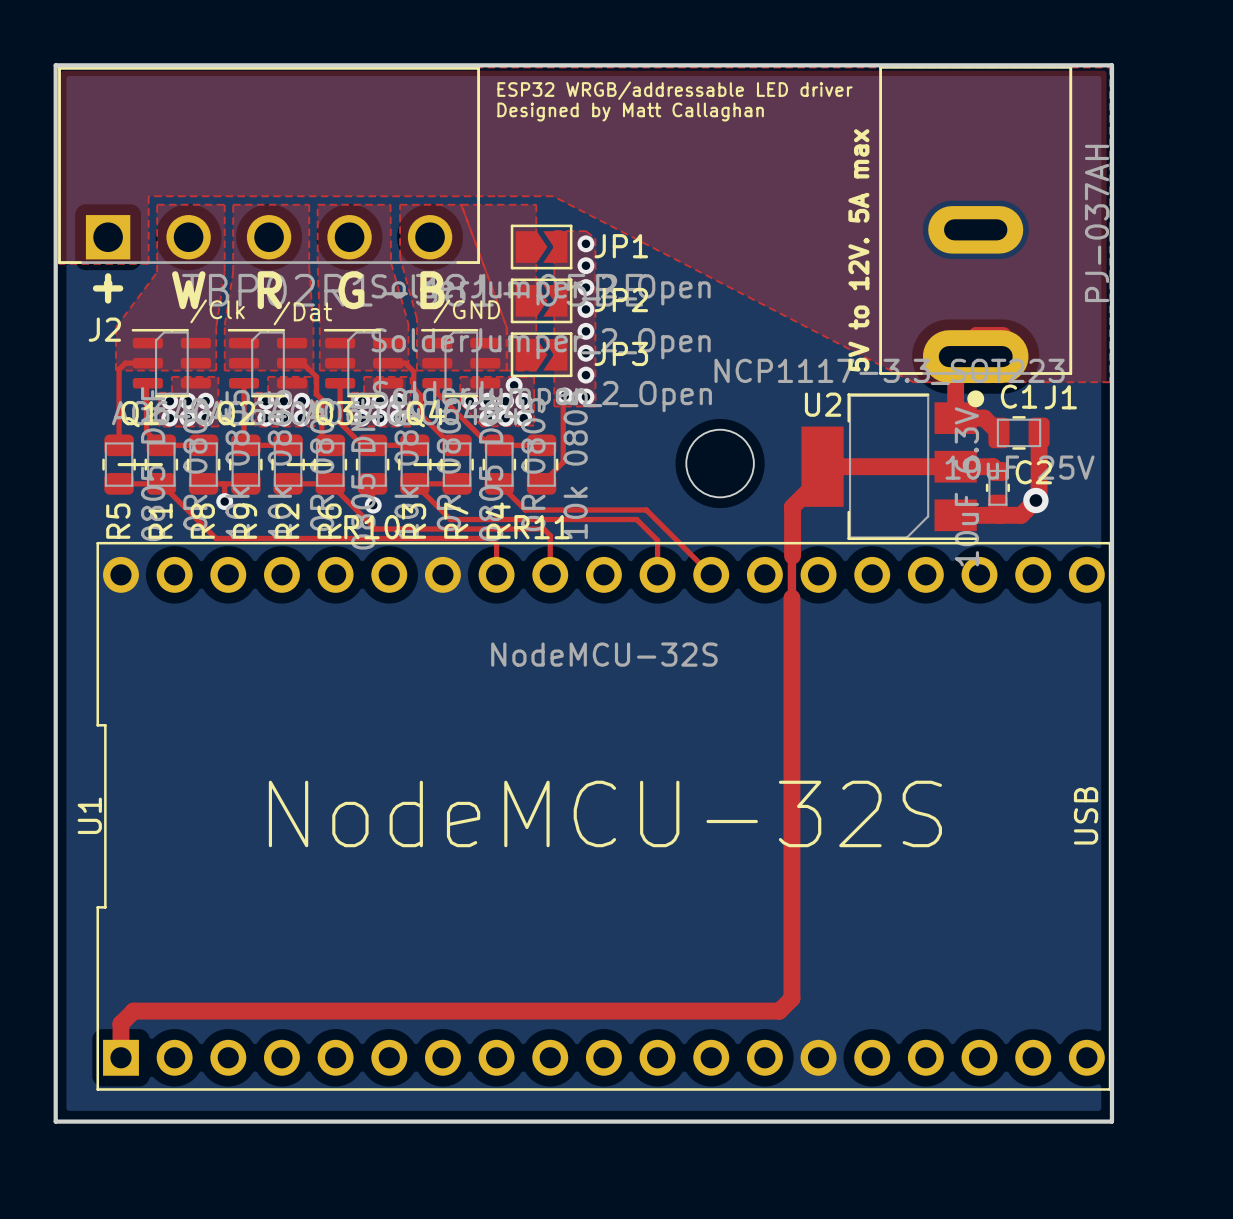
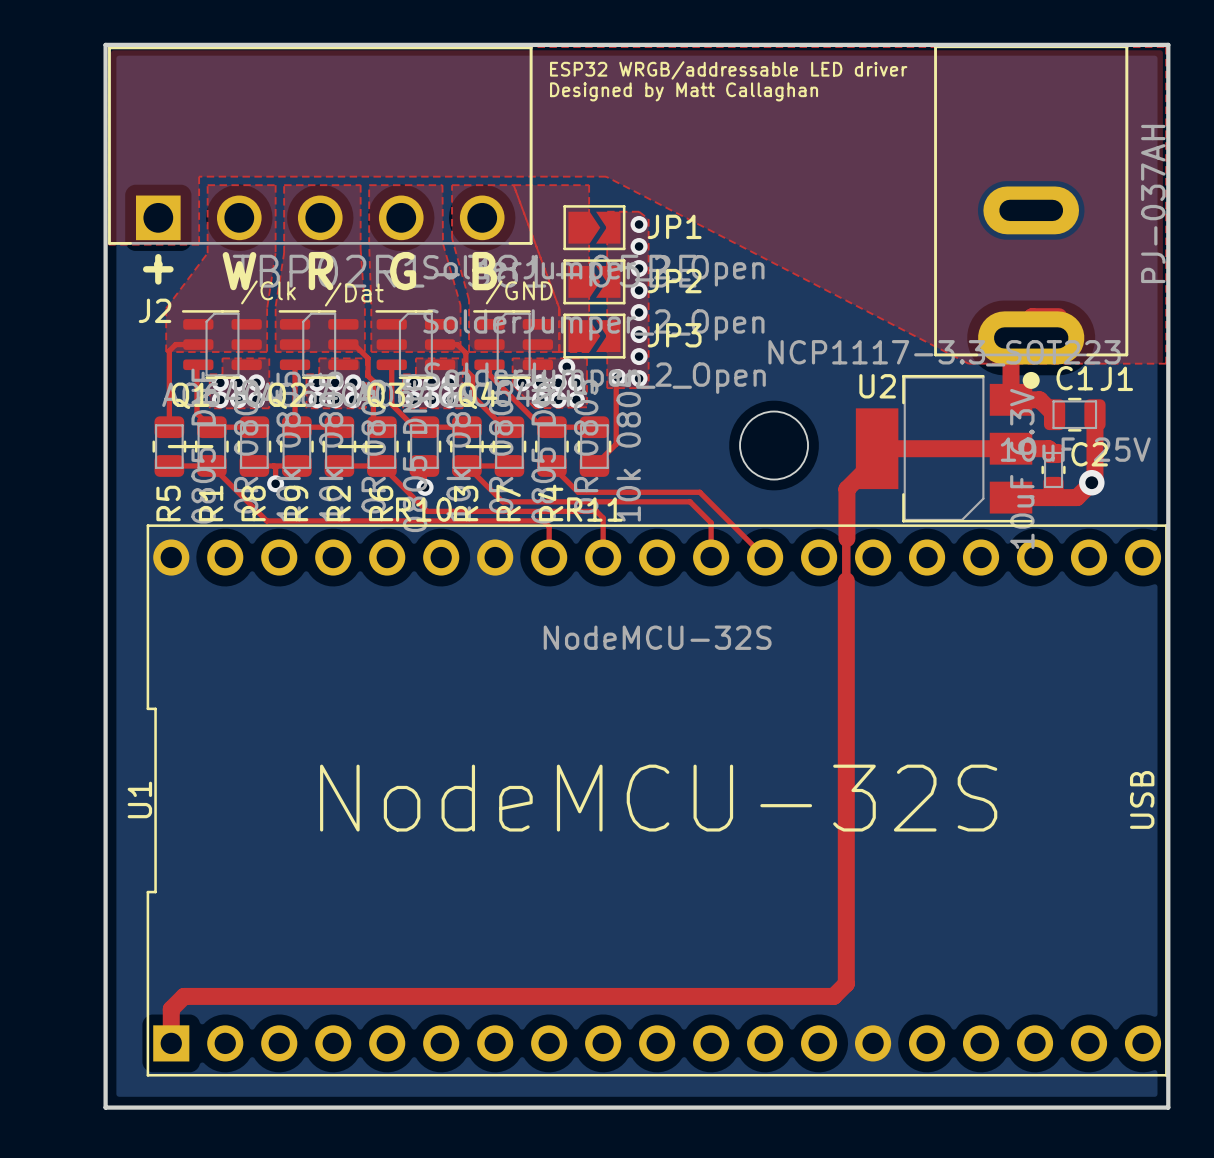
text: 5V to 12V. 5A max (858, 250) -> none

